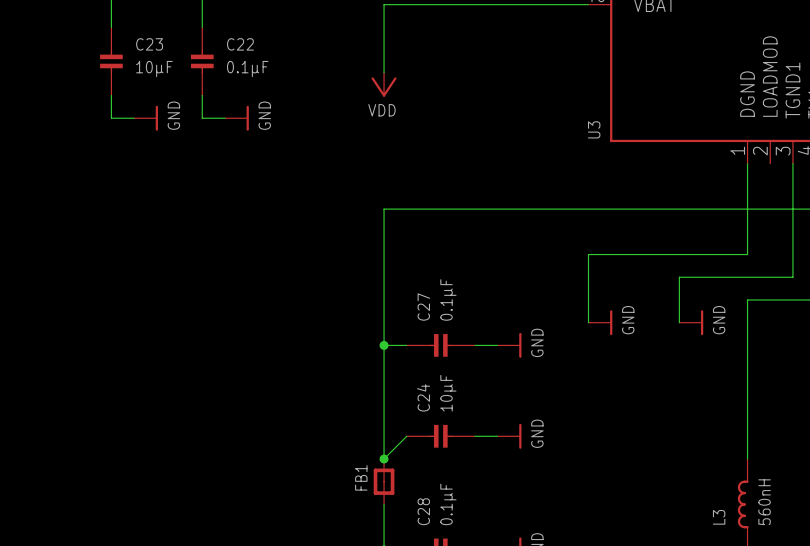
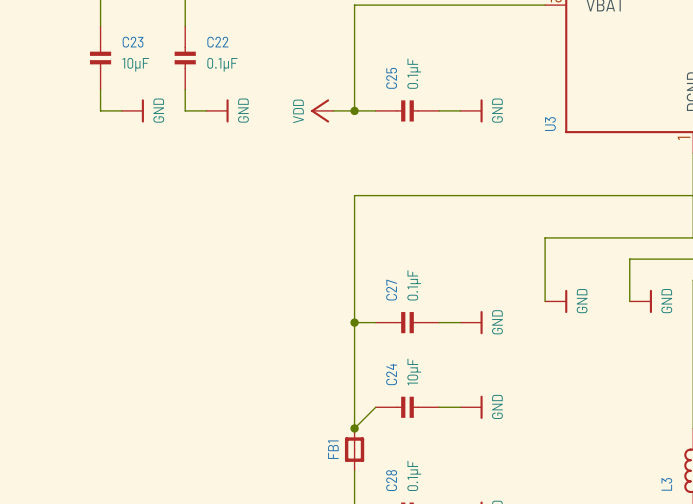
power symbol position: VDD (384, 84) -> VDD (322, 110)
power symbol rotation: 0° (384, 87) -> 90° clockwise (320, 110)
wire: none -> (333, 110) (375, 110)
junction: none -> (354, 110)
C25: none -> 0.1µF (407, 110)
wire: none -> (439, 110) (460, 110)
power symbol: none -> GND (471, 110)

